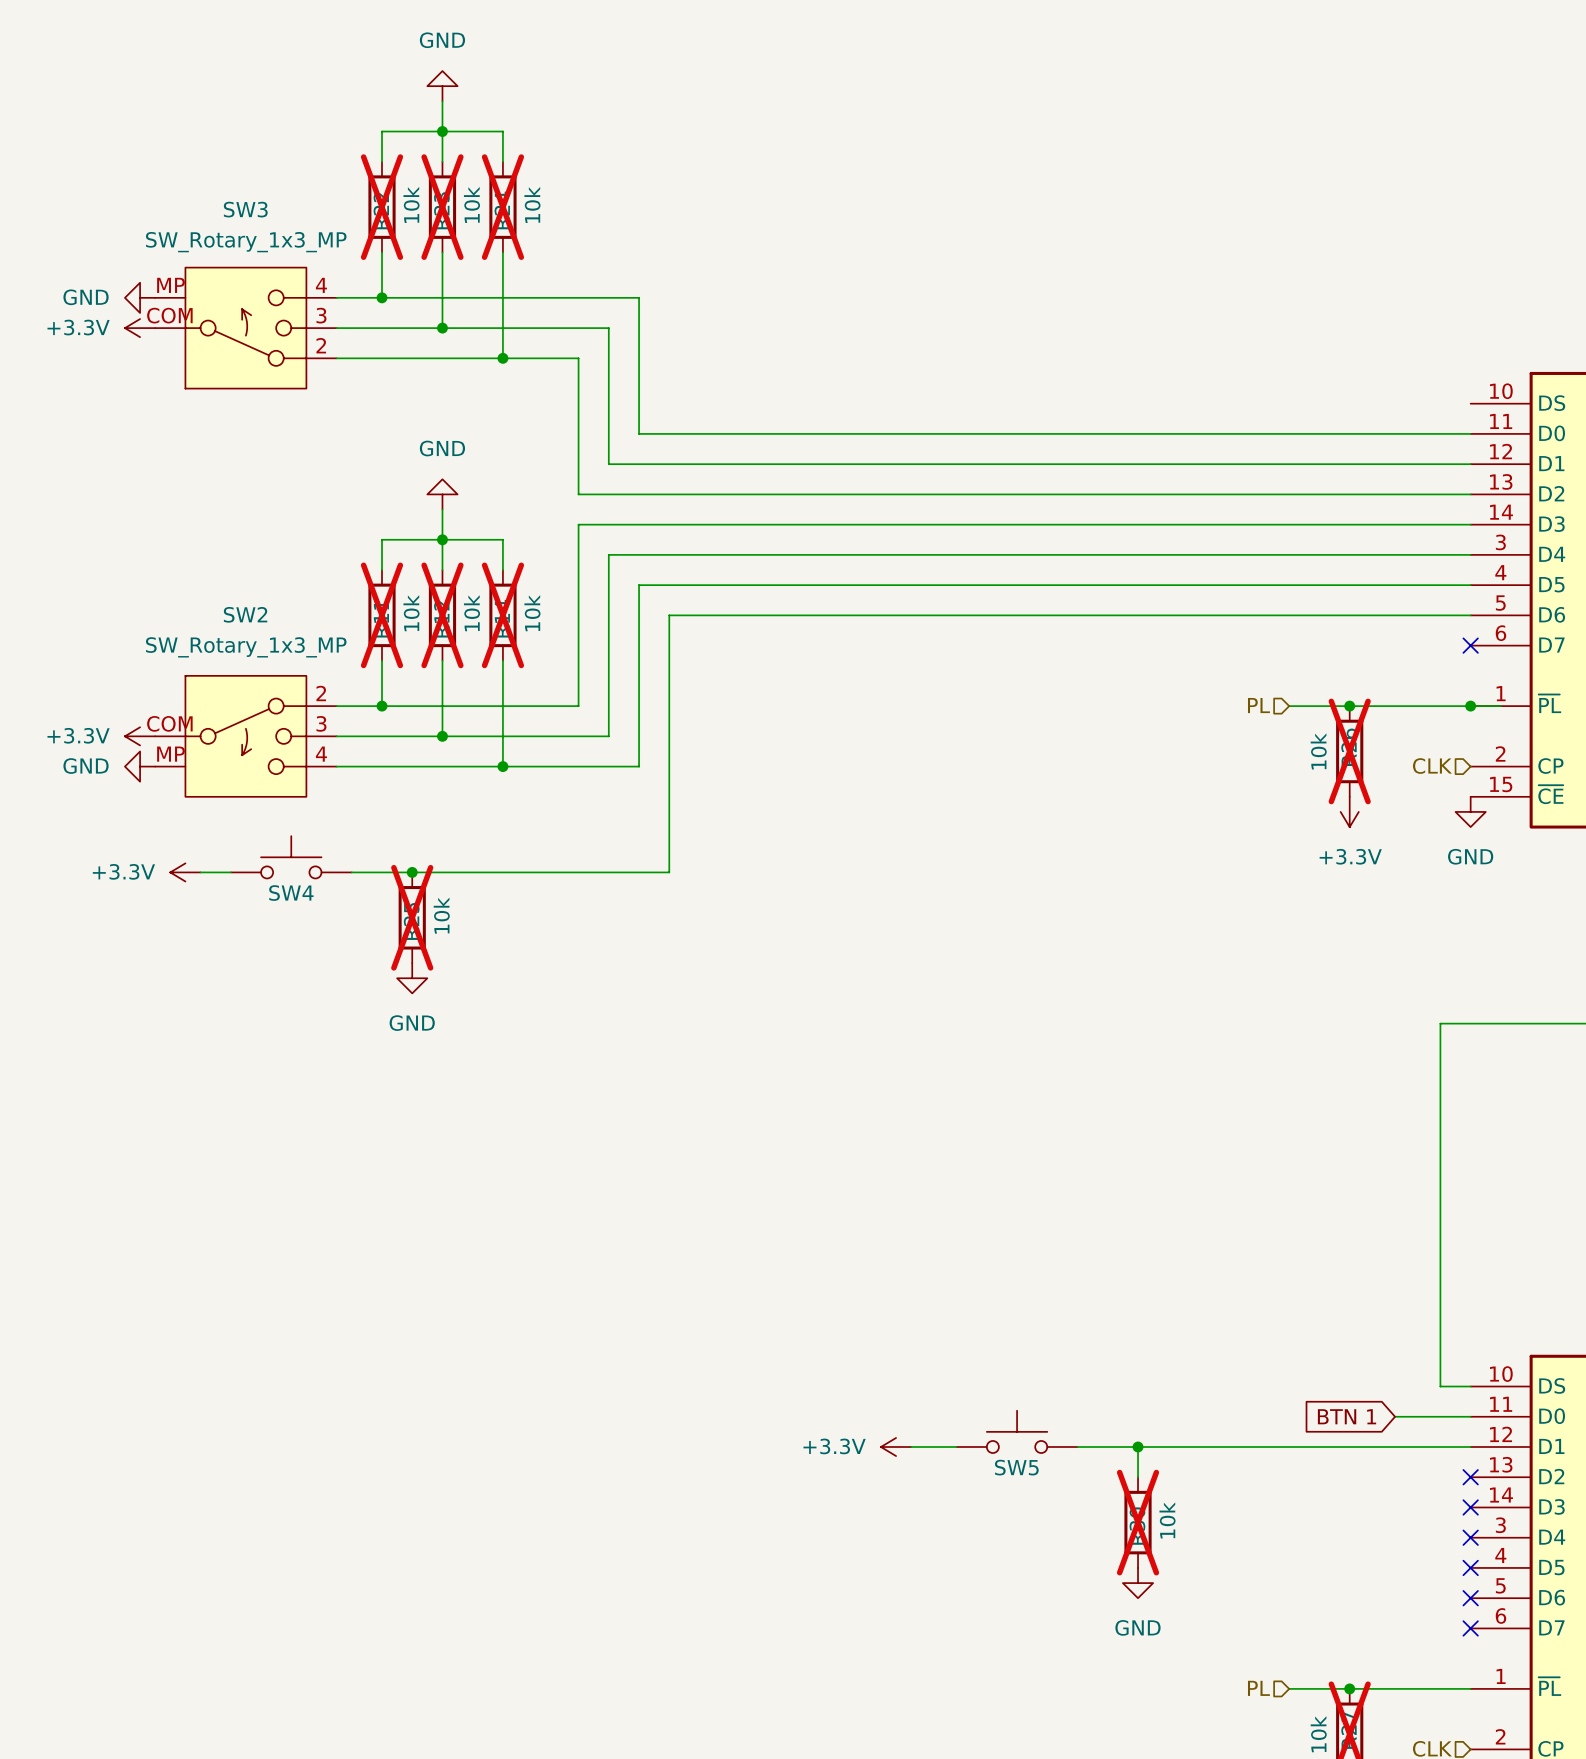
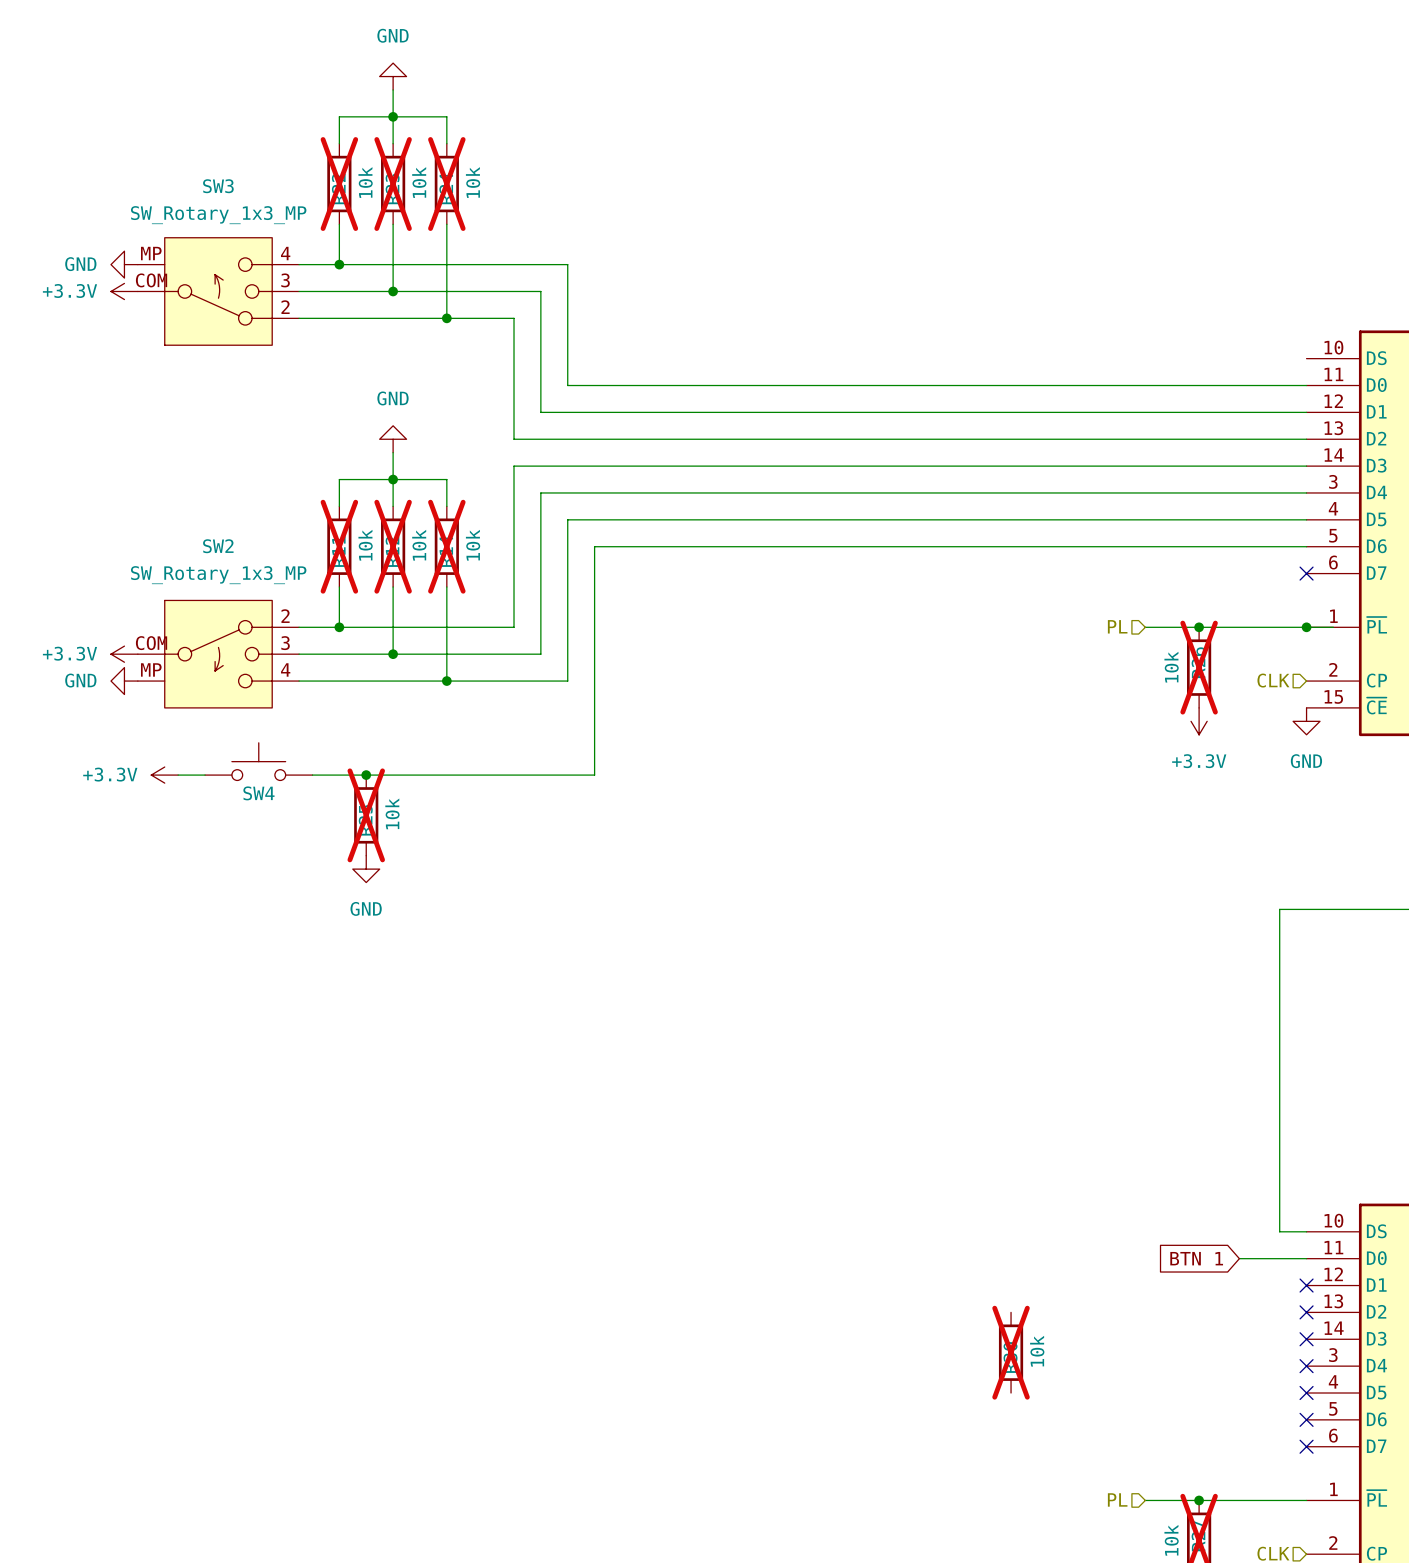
SW5: (1017, 1431) -> none
power symbol: +3.3V (896, 1447) -> none
wire: (911, 1447) (956, 1447) -> none
wire: (1077, 1447) (1470, 1447) -> none
wire: (1138, 1447) (1138, 1477) -> none
junction: (1138, 1447) -> none
no-connect mark: none -> (1306, 1285)
power symbol: GND (1138, 1583) -> none

